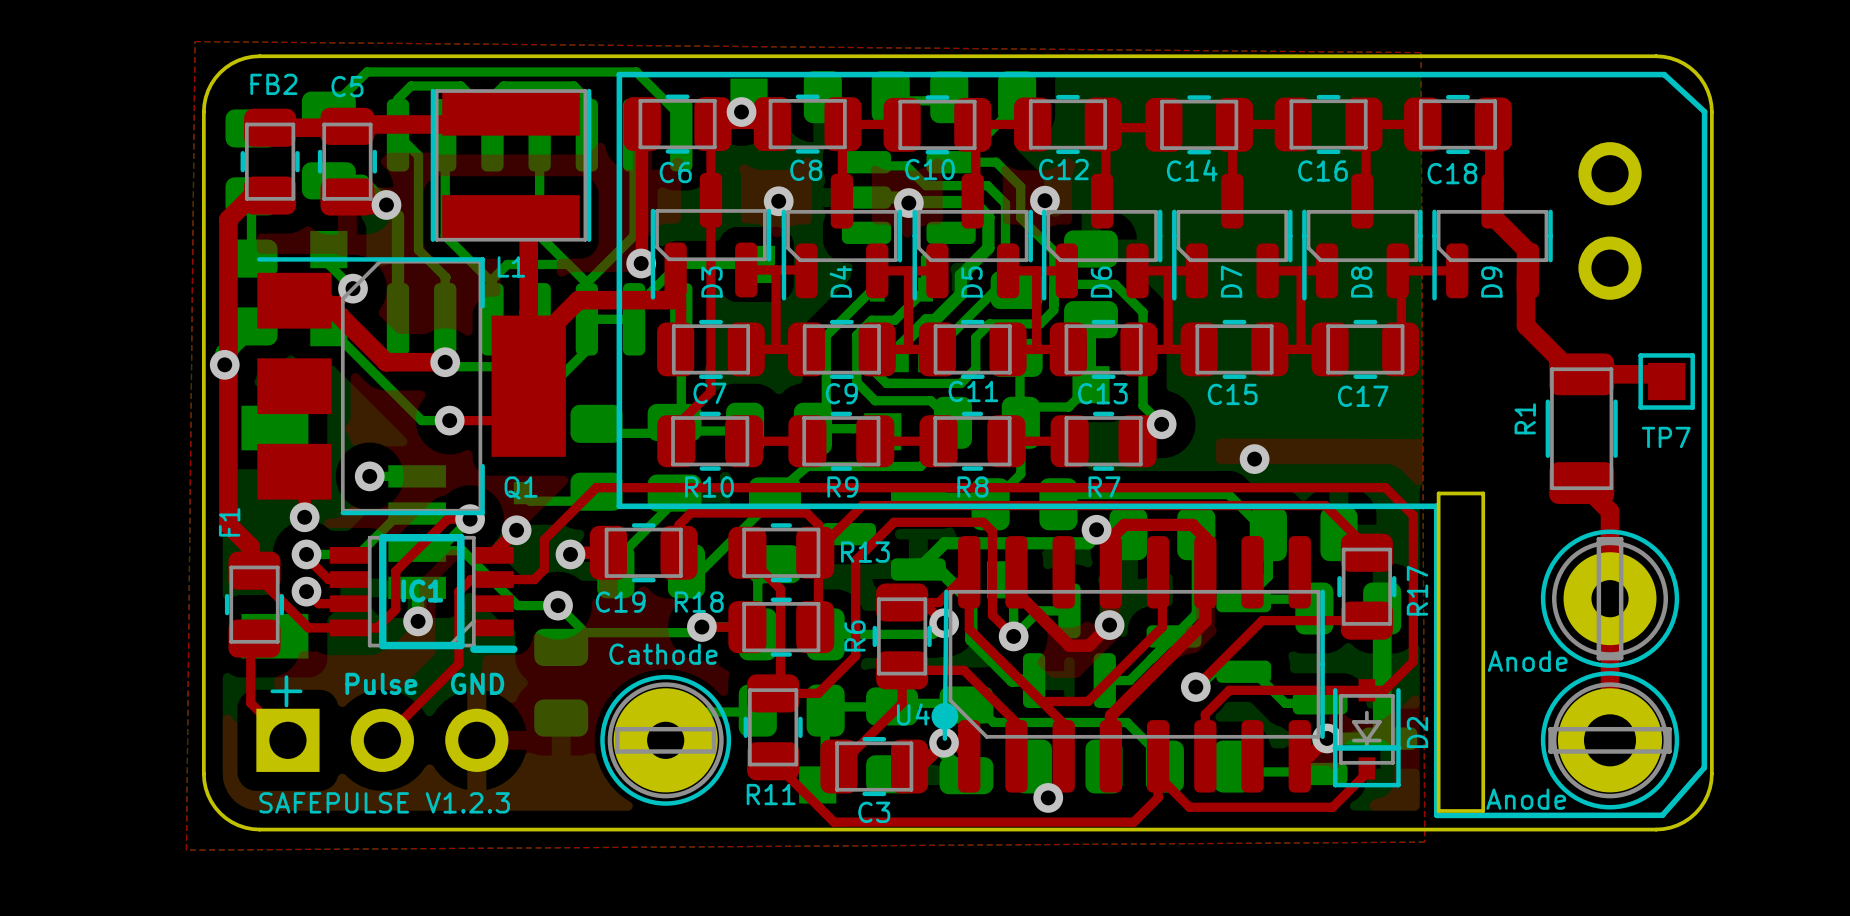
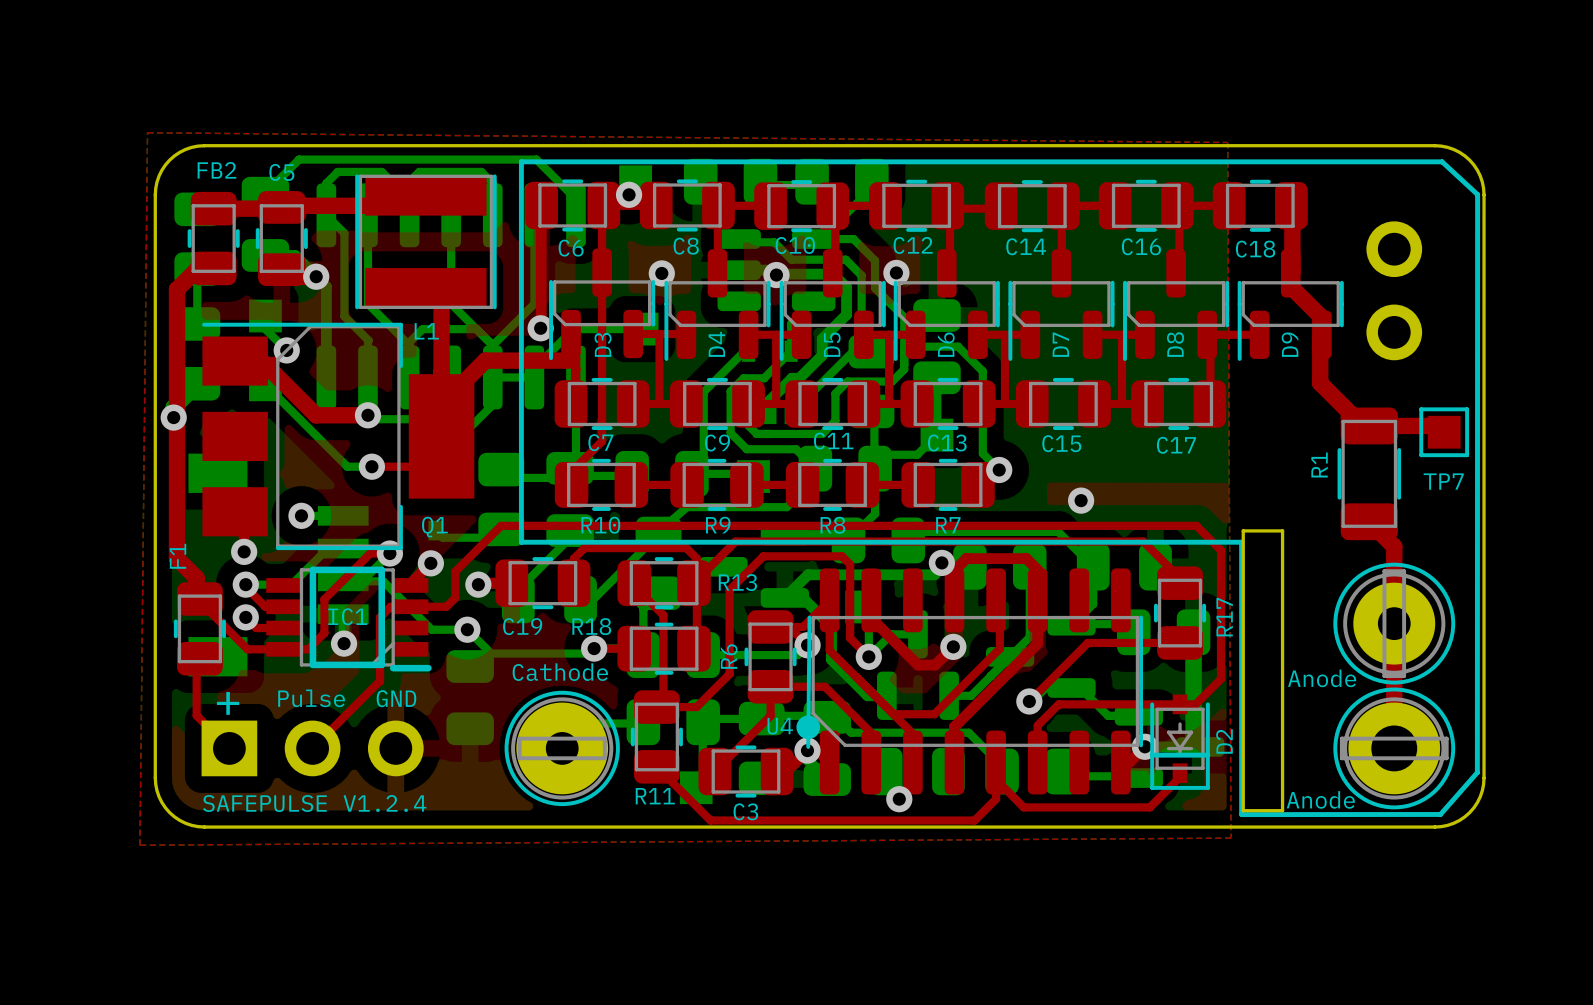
text: SAFEPULSE V1.2.3 (384, 802) -> SAFEPULSE V1.2.4 (314, 803)

